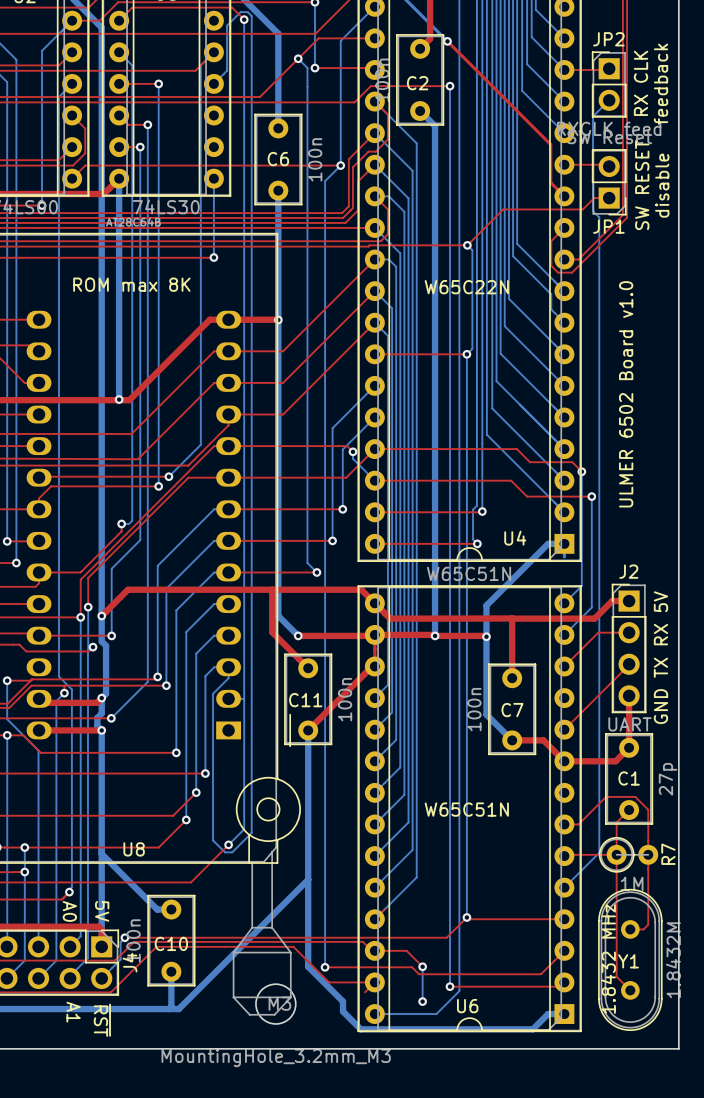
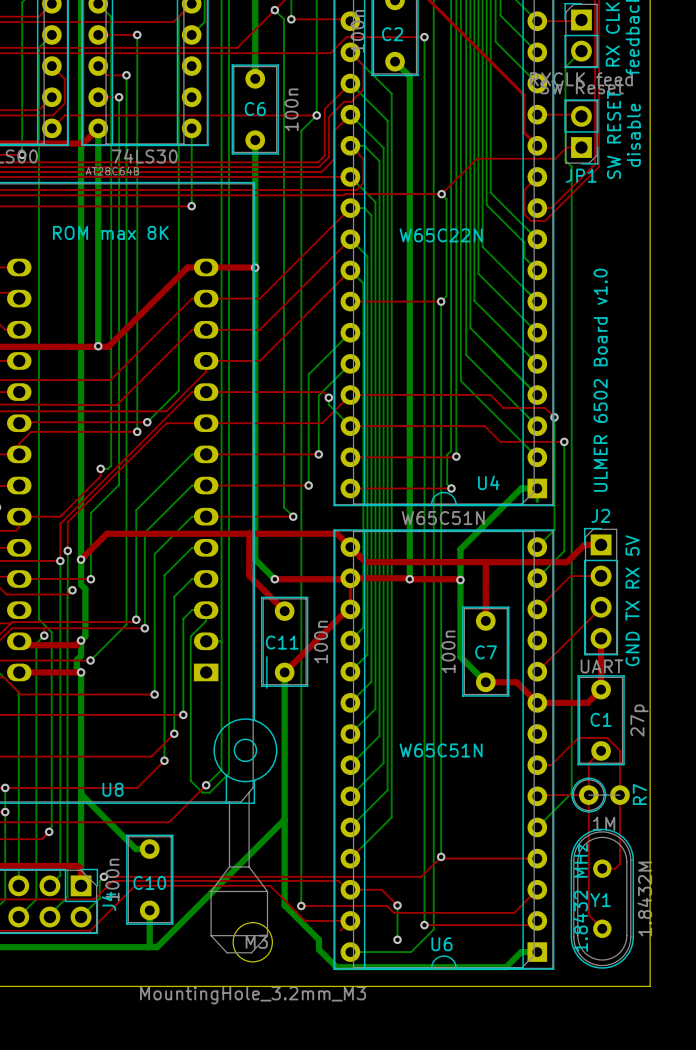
text position: ULMER 6502 Board v1.0 (626, 394) -> ULMER 6502 Board v1.0 (600, 380)
text: A0 (69, 911) -> none
text: 5V (102, 911) -> none
text: A1 (73, 1012) -> none
text: ~{RST} (102, 1020) -> none

